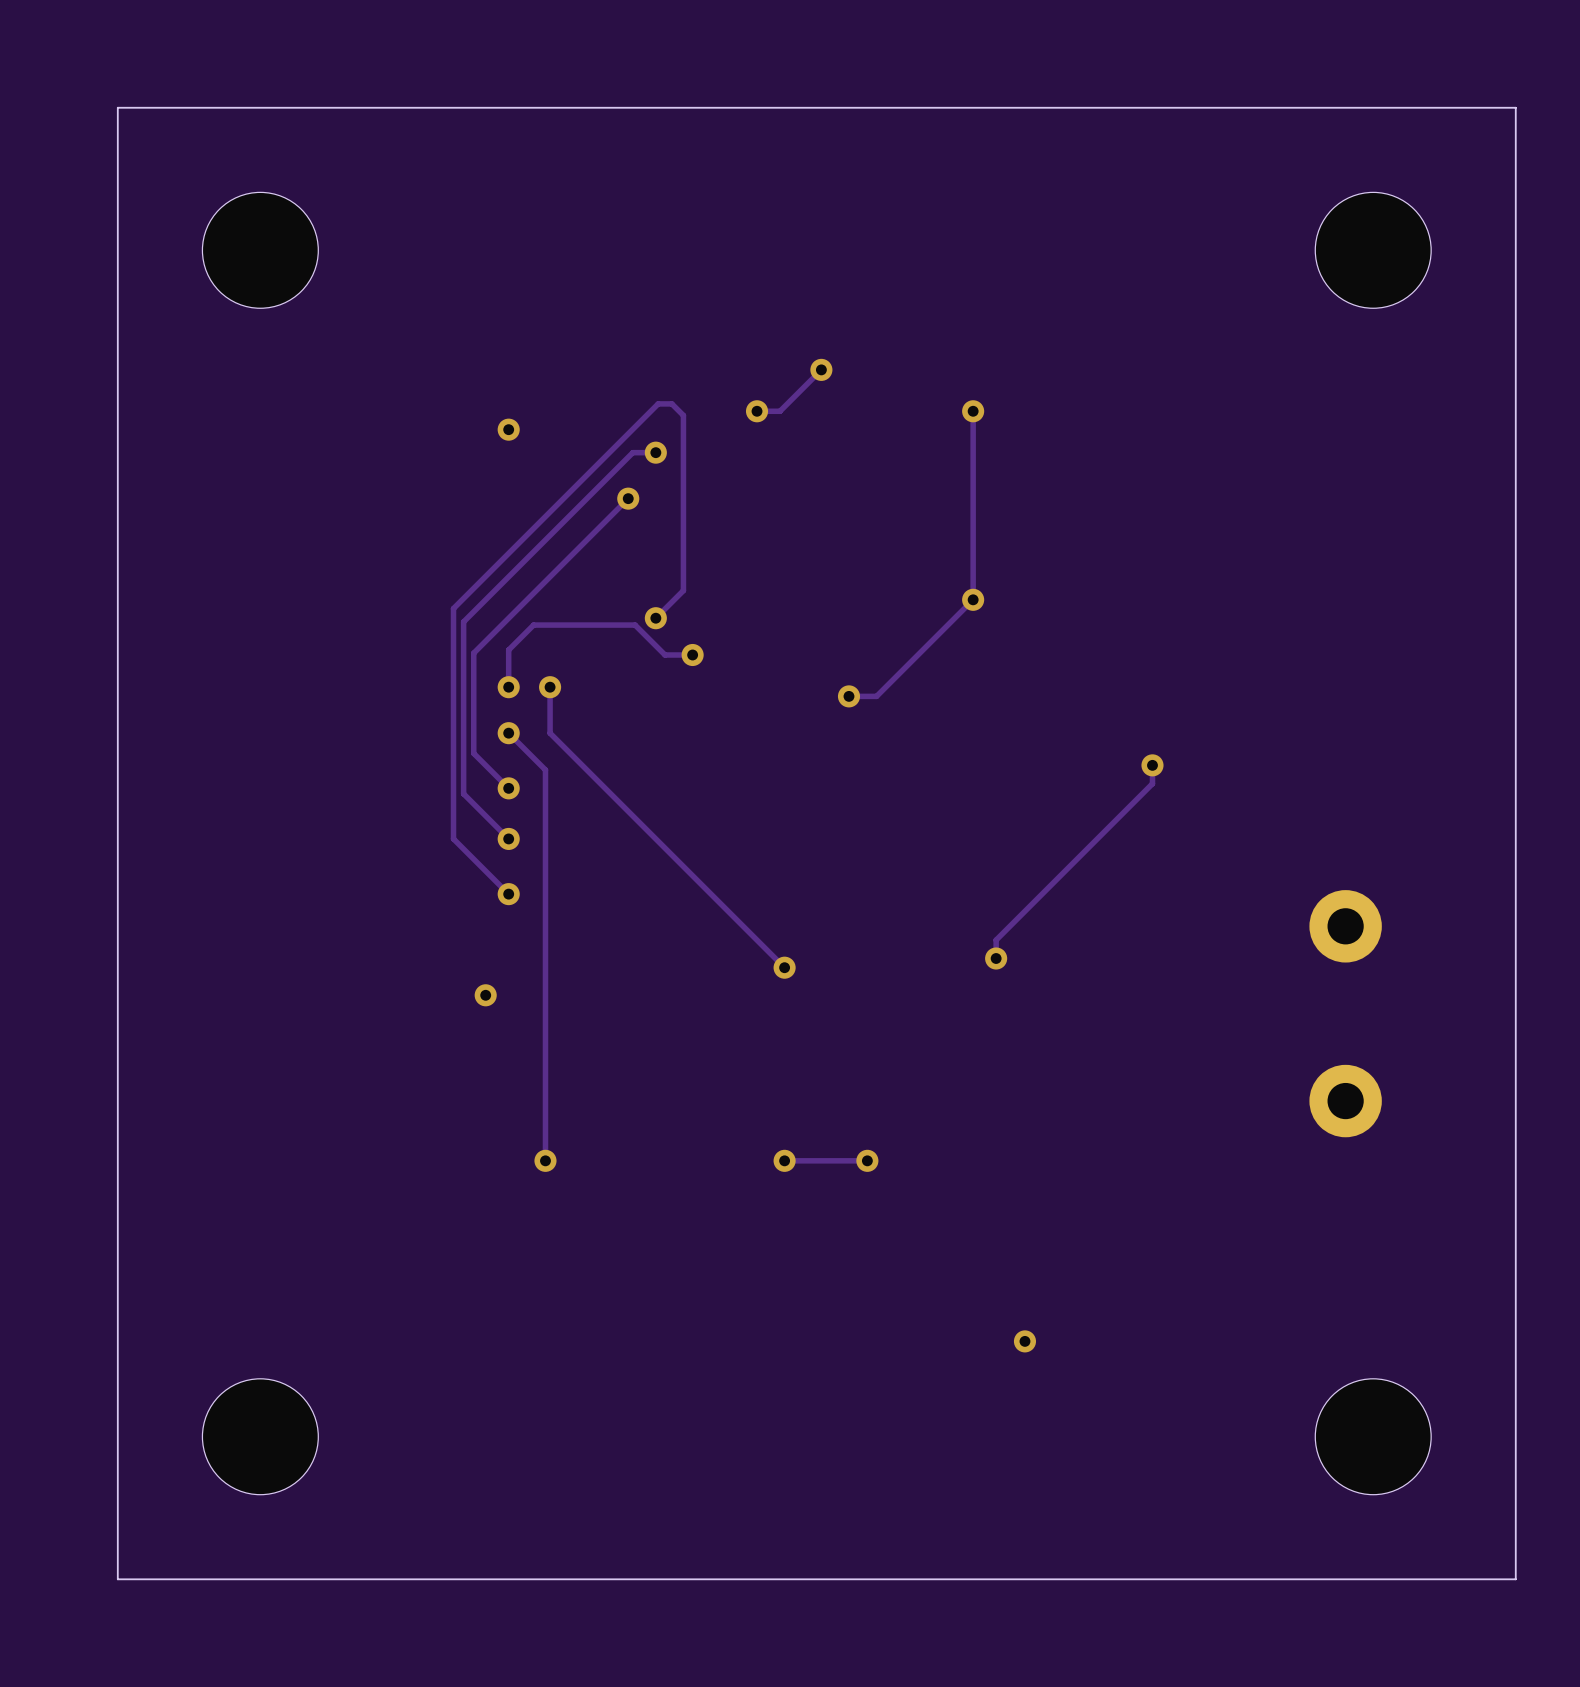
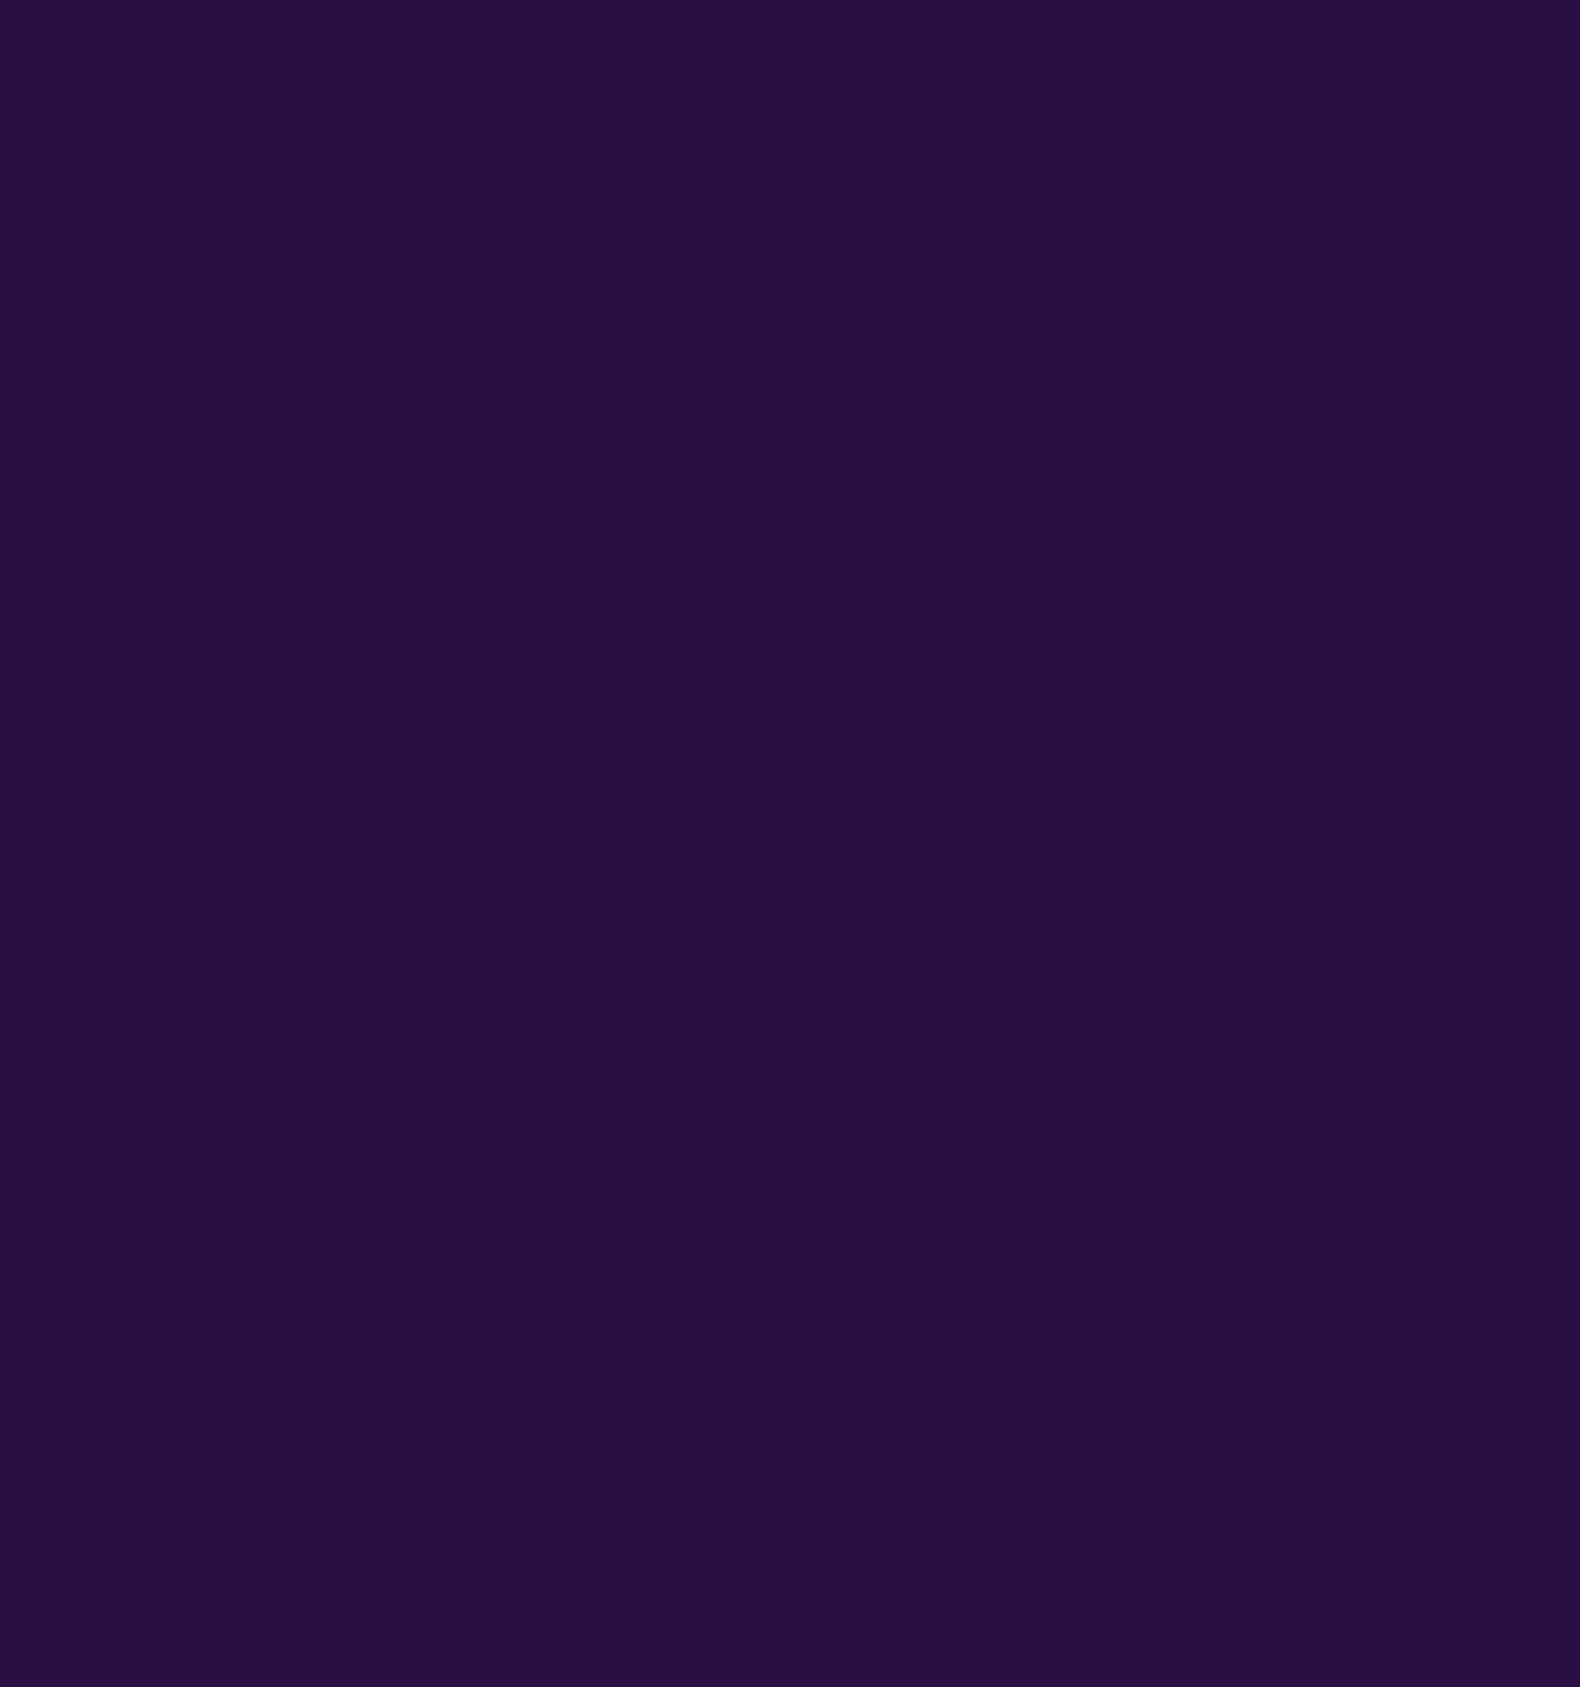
board edge: (1515, 107) (117, 107) (117, 1579) (1515, 1579) (1515, 107) -> none
part: (260, 250) -> none
part: (1373, 250) -> none
track: (821, 369) (780, 411) (757, 411) -> none
via: (821, 369) -> none
via: (757, 411) -> none
track: (973, 411) (973, 599) (876, 696) (848, 696) -> none
via: (973, 411) -> none
via: (508, 429) -> none
track: (655, 452) (632, 452) (463, 621) (463, 793) (508, 838) -> none
via: (655, 452) -> none
track: (628, 498) (473, 653) (473, 753) (508, 788) -> none
via: (628, 498) -> none
via: (973, 599) -> none
track: (655, 618) (683, 590) (683, 415) (671, 403) (658, 403) (453, 608) (453, 838) (508, 894) -> none
via: (655, 618) -> none
track: (692, 654) (665, 654) (635, 625) (533, 625) (508, 649) (508, 687) -> none
via: (692, 654) -> none
via: (508, 687) -> none
track: (550, 687) (550, 733) (784, 967) -> none
via: (550, 687) -> none
via: (848, 696) -> none
track: (508, 733) (545, 769) (545, 1160) -> none
via: (508, 733) -> none
track: (1152, 765) (1152, 783) (996, 940) (996, 958) -> none
via: (1152, 765) -> none
via: (508, 788) -> none
via: (508, 838) -> none
via: (508, 894) -> none
part: (1345, 926) -> none
via: (996, 958) -> none
via: (784, 967) -> none
via: (485, 995) -> none
part: (1345, 1101) -> none
via: (545, 1160) -> none
via: (784, 1160) -> none
track: (867, 1160) (784, 1160) -> none
via: (867, 1160) -> none
via: (1024, 1341) -> none
part: (260, 1436) -> none
part: (1373, 1436) -> none

